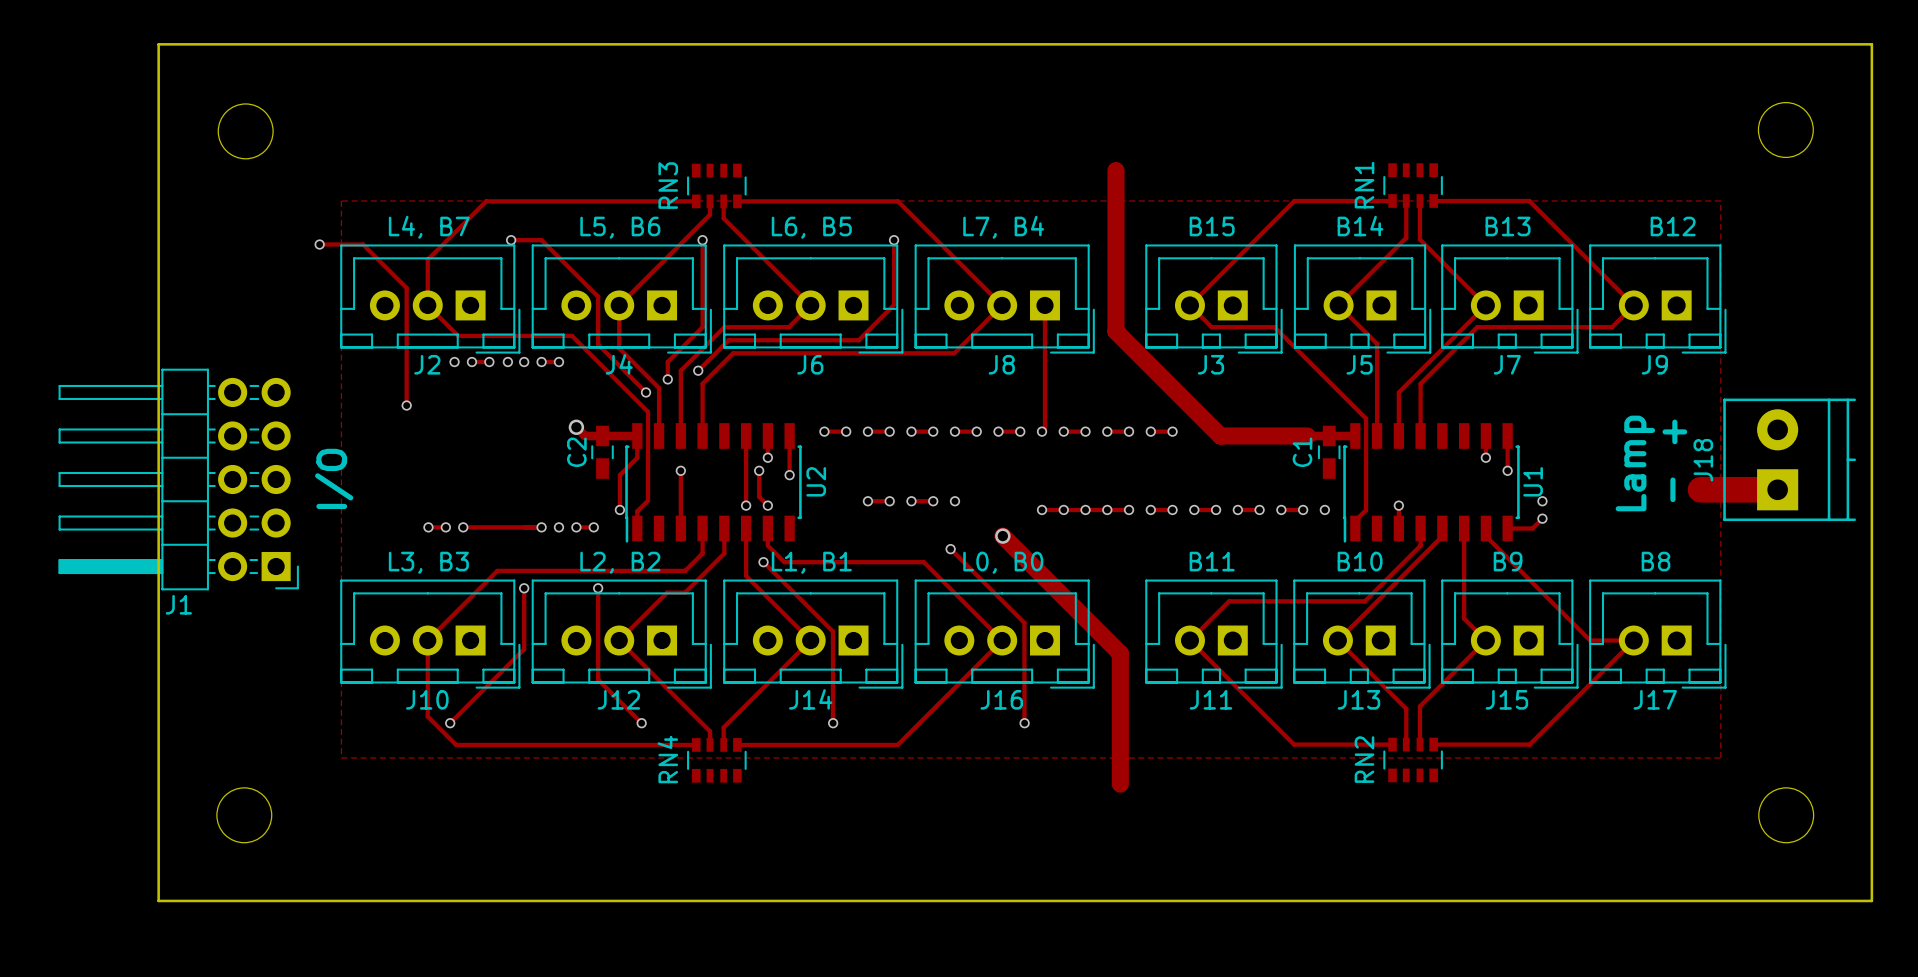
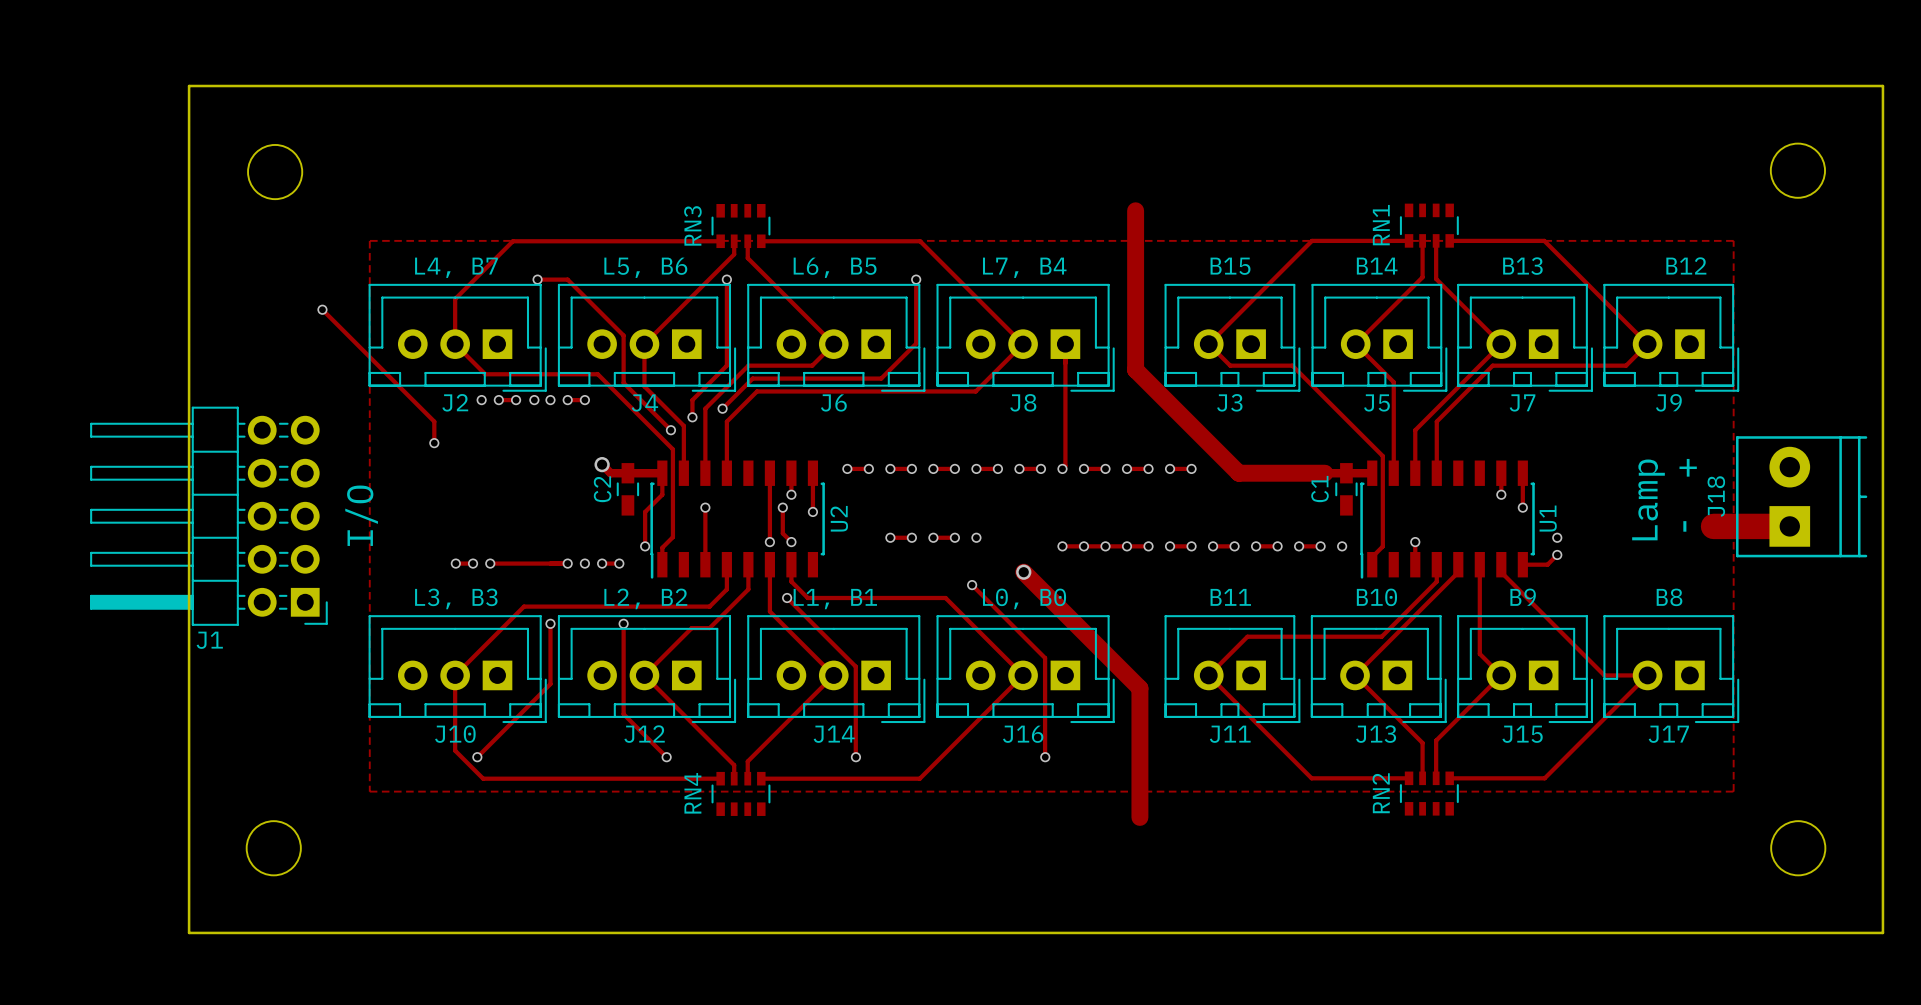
track: (319, 244) (363, 244) (406, 288) (406, 383) -> (322, 309) (434, 421)
via position: (319, 244) -> (322, 309)

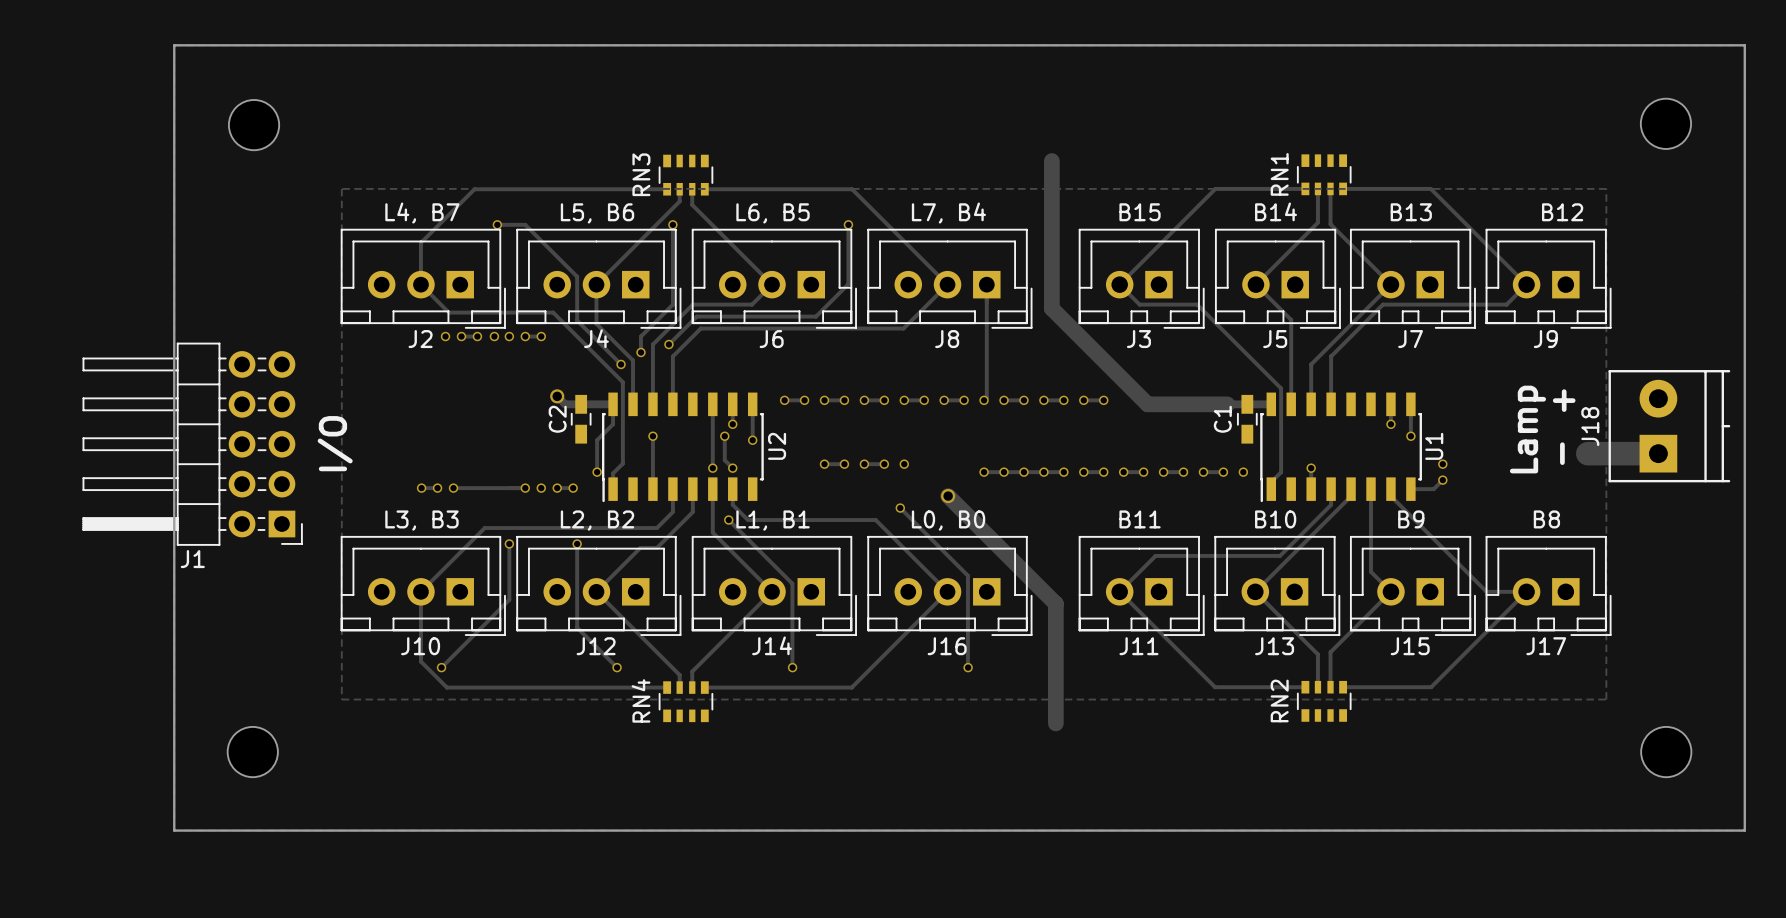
track: (322, 309) (434, 421) (434, 443) -> none
via: (322, 309) -> none
via: (434, 443) -> none

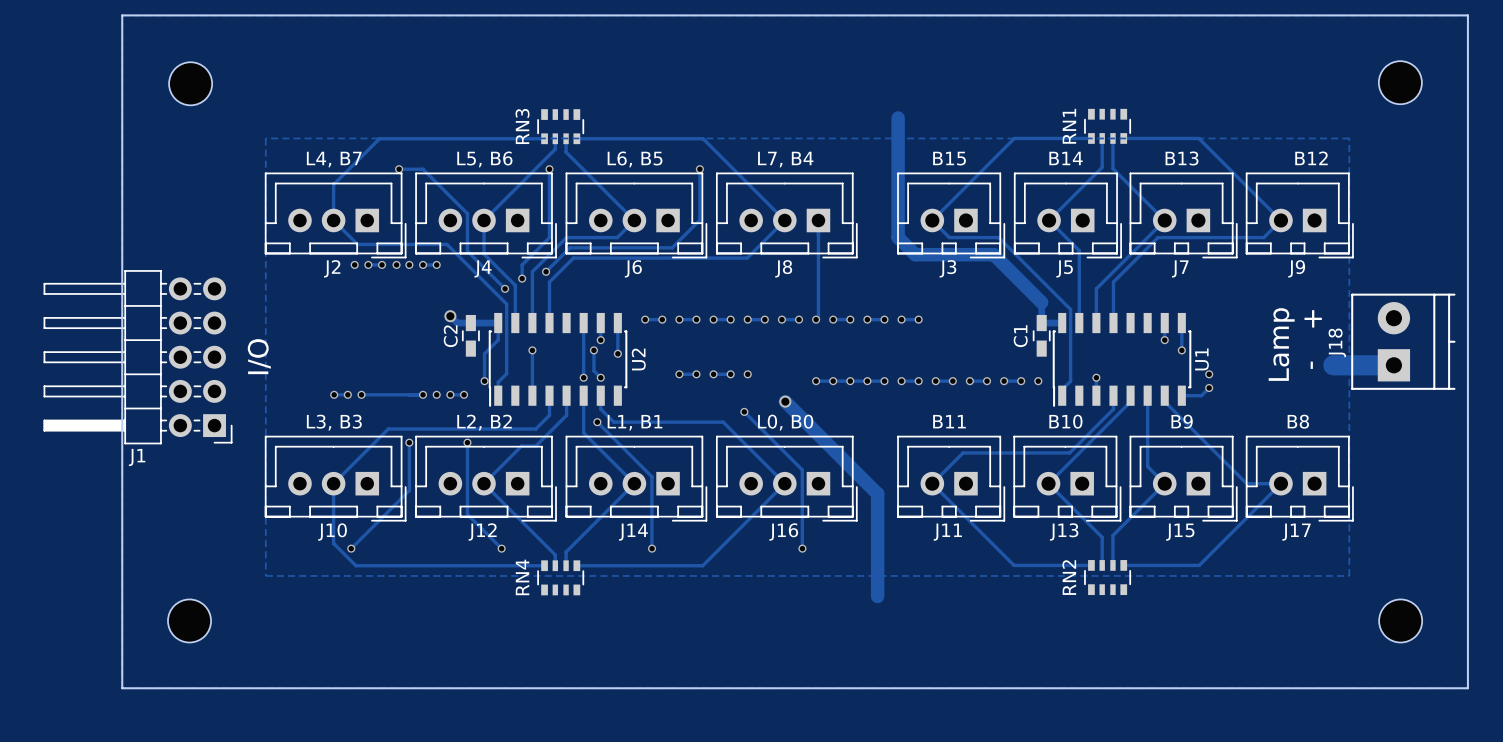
track: (1051, 161) (1051, 308) (1147, 404) (1247, 404) -> (898, 117) (898, 237) (915, 254) (993, 254) (1041, 302) (1041, 323)

